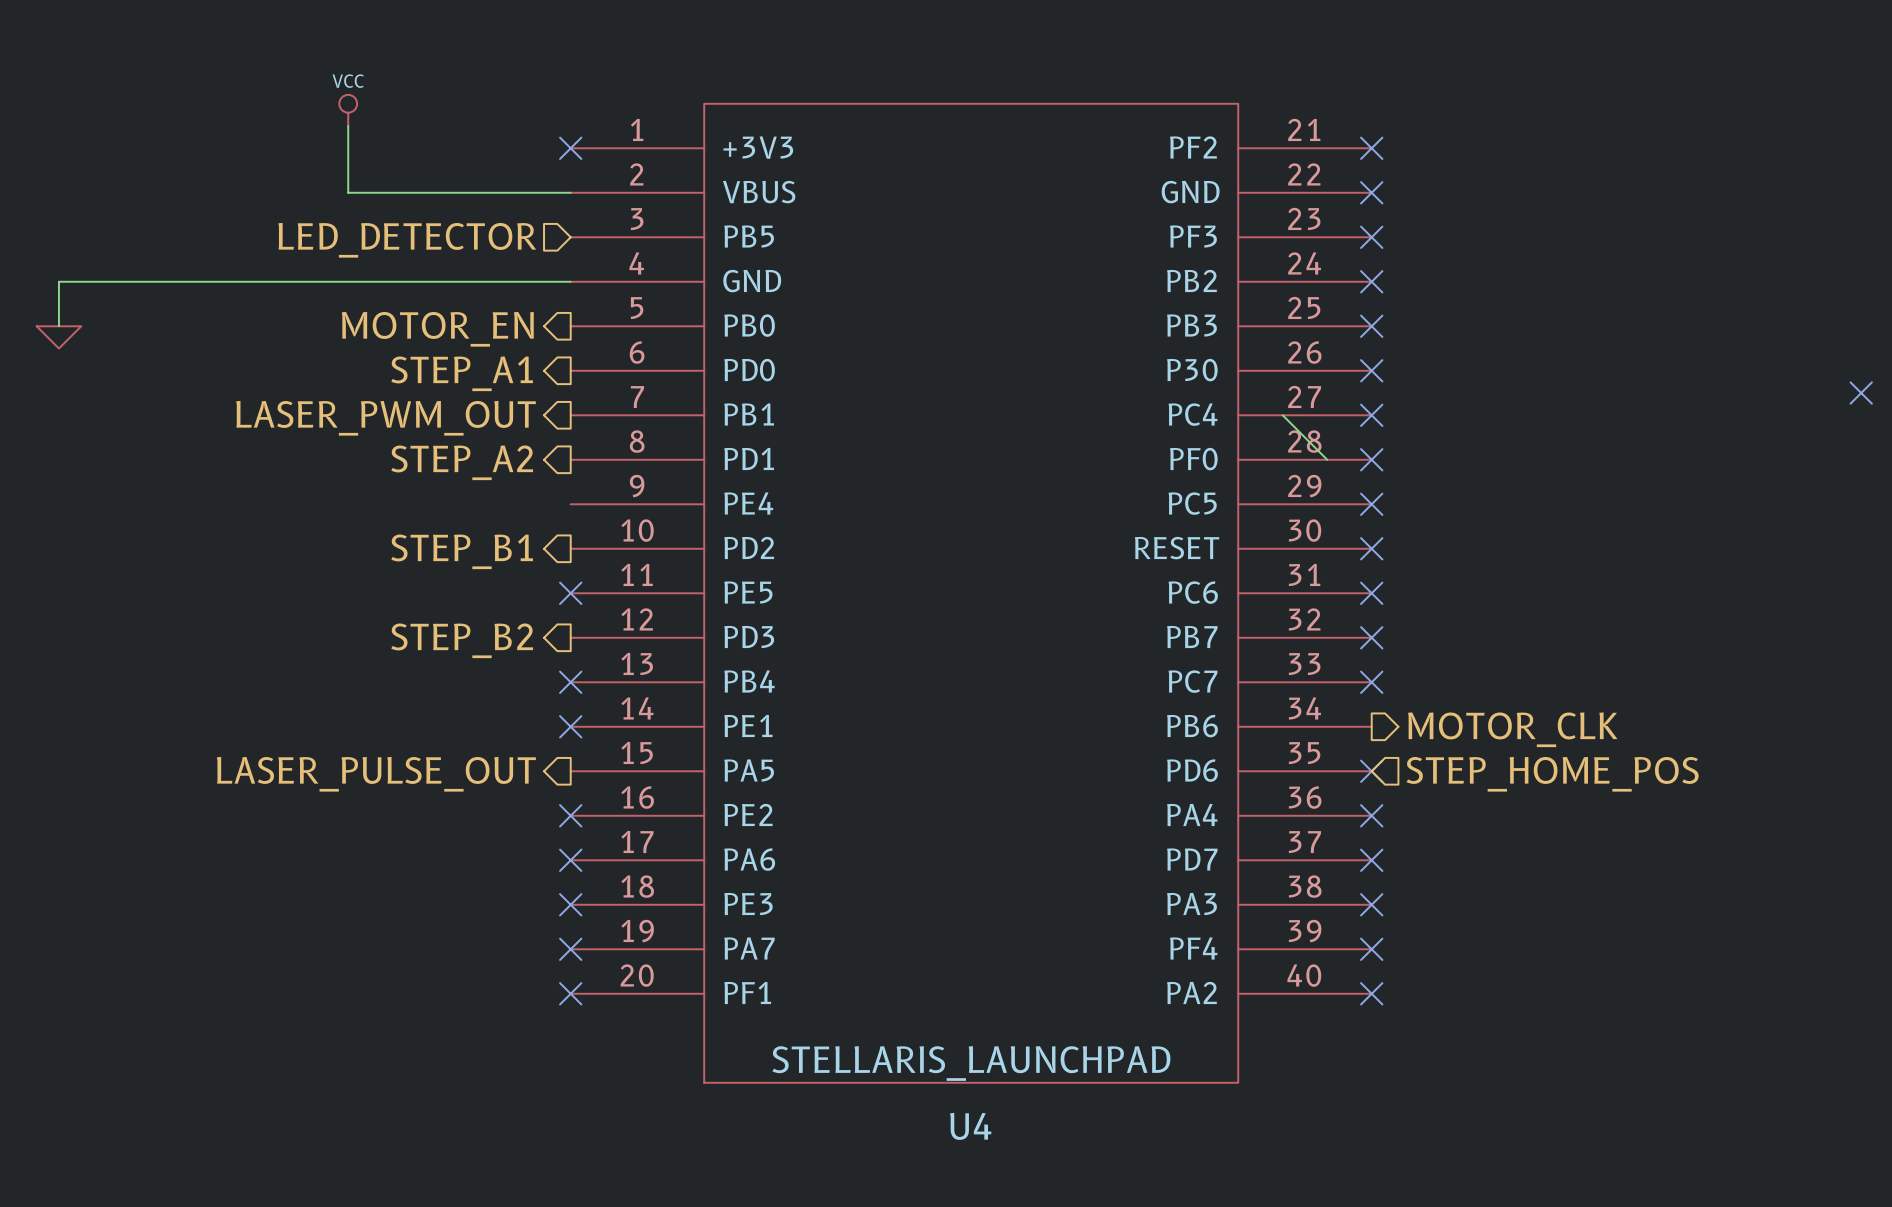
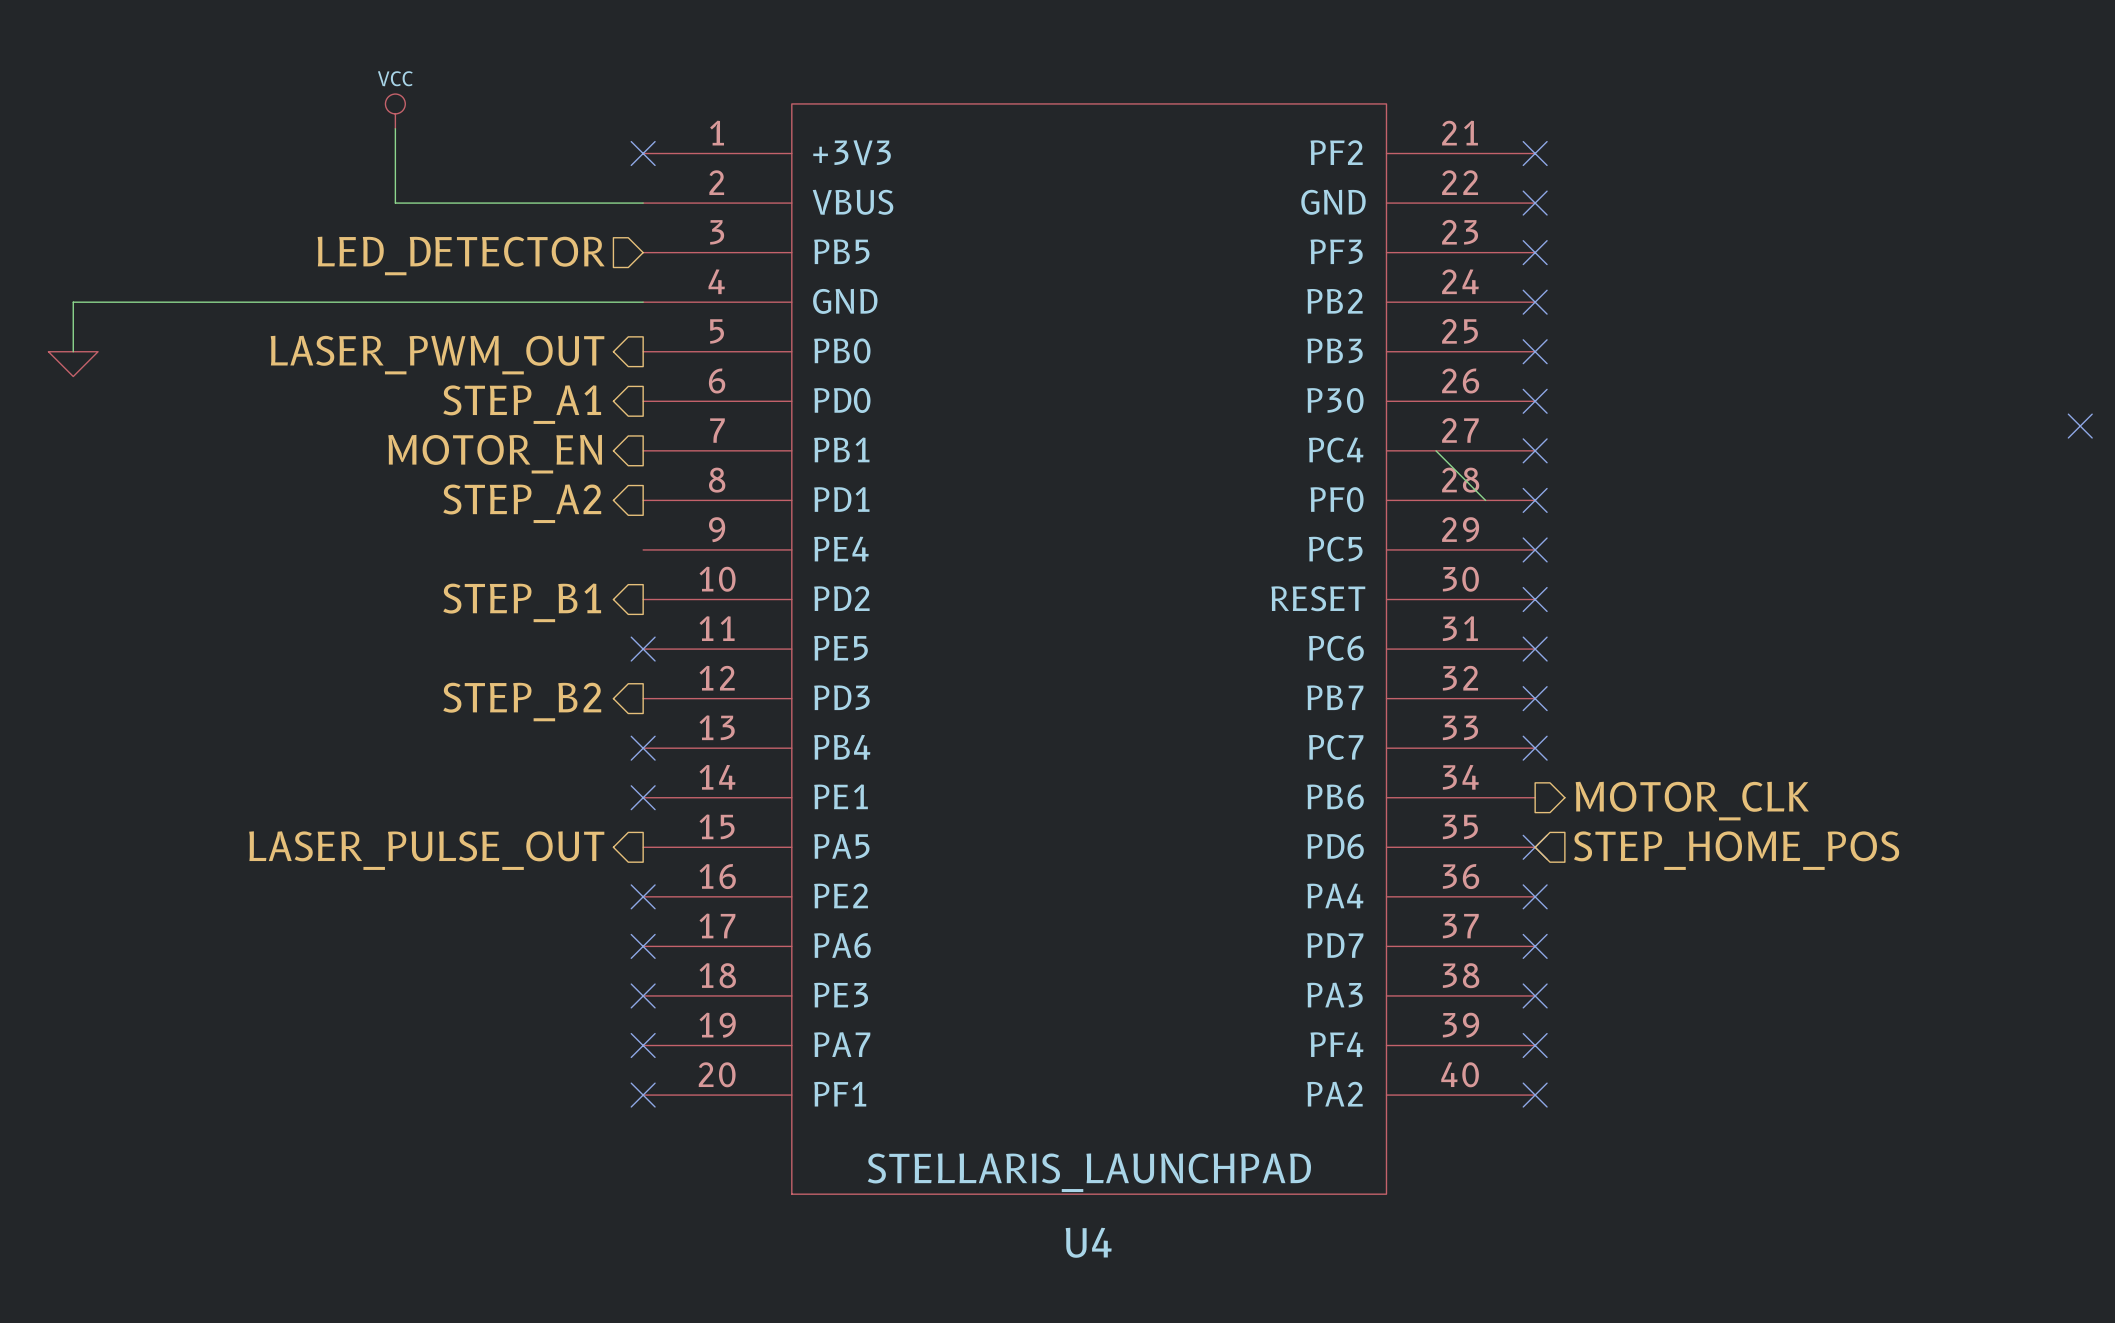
hierarchical label: MOTOR_EN (437, 329) -> LASER_PWM_OUT (437, 355)
hierarchical label: LASER_PWM_OUT (386, 418) -> MOTOR_EN (495, 454)

